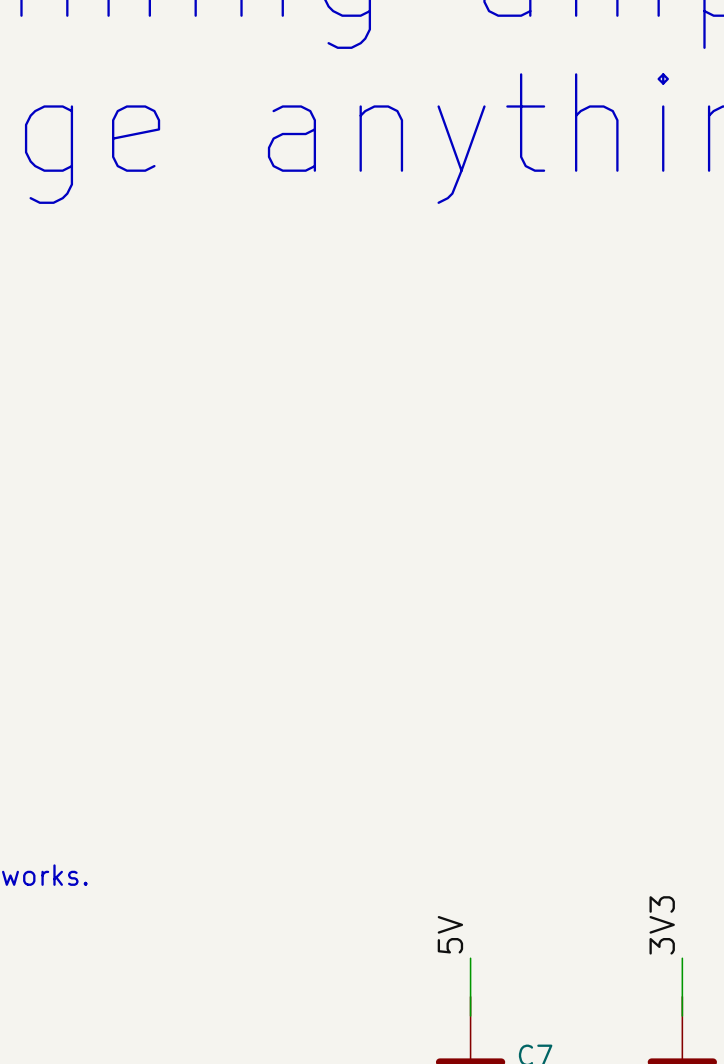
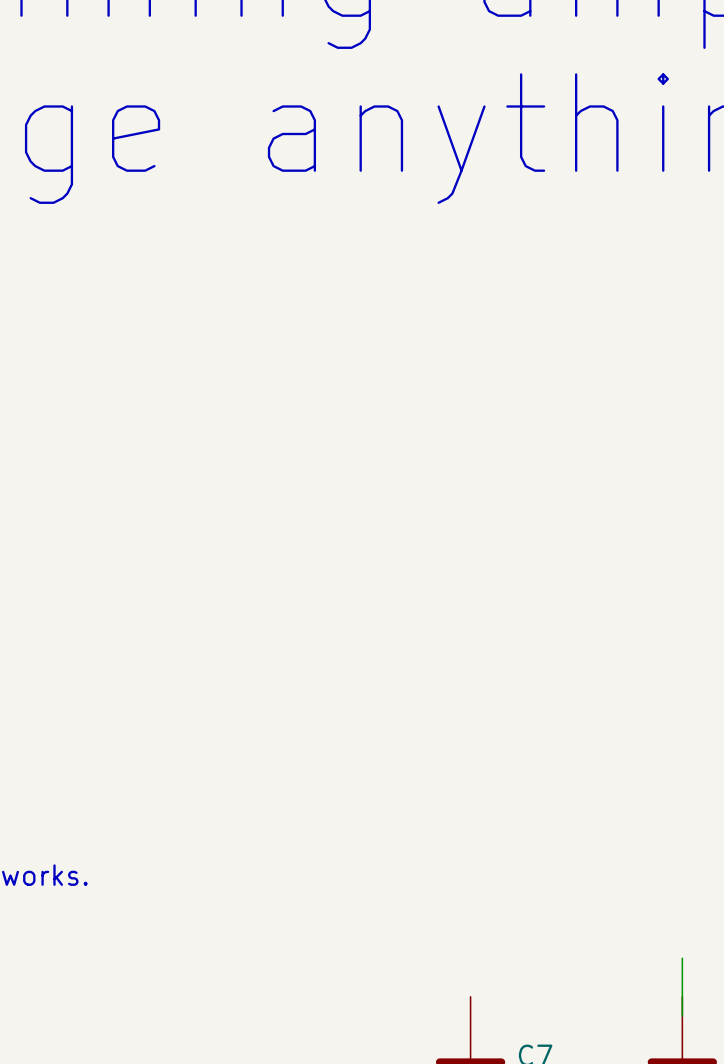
label: 3V3 (662, 925) -> none
label: 5V (450, 934) -> none
wire: (470, 958) (470, 1016) -> none

